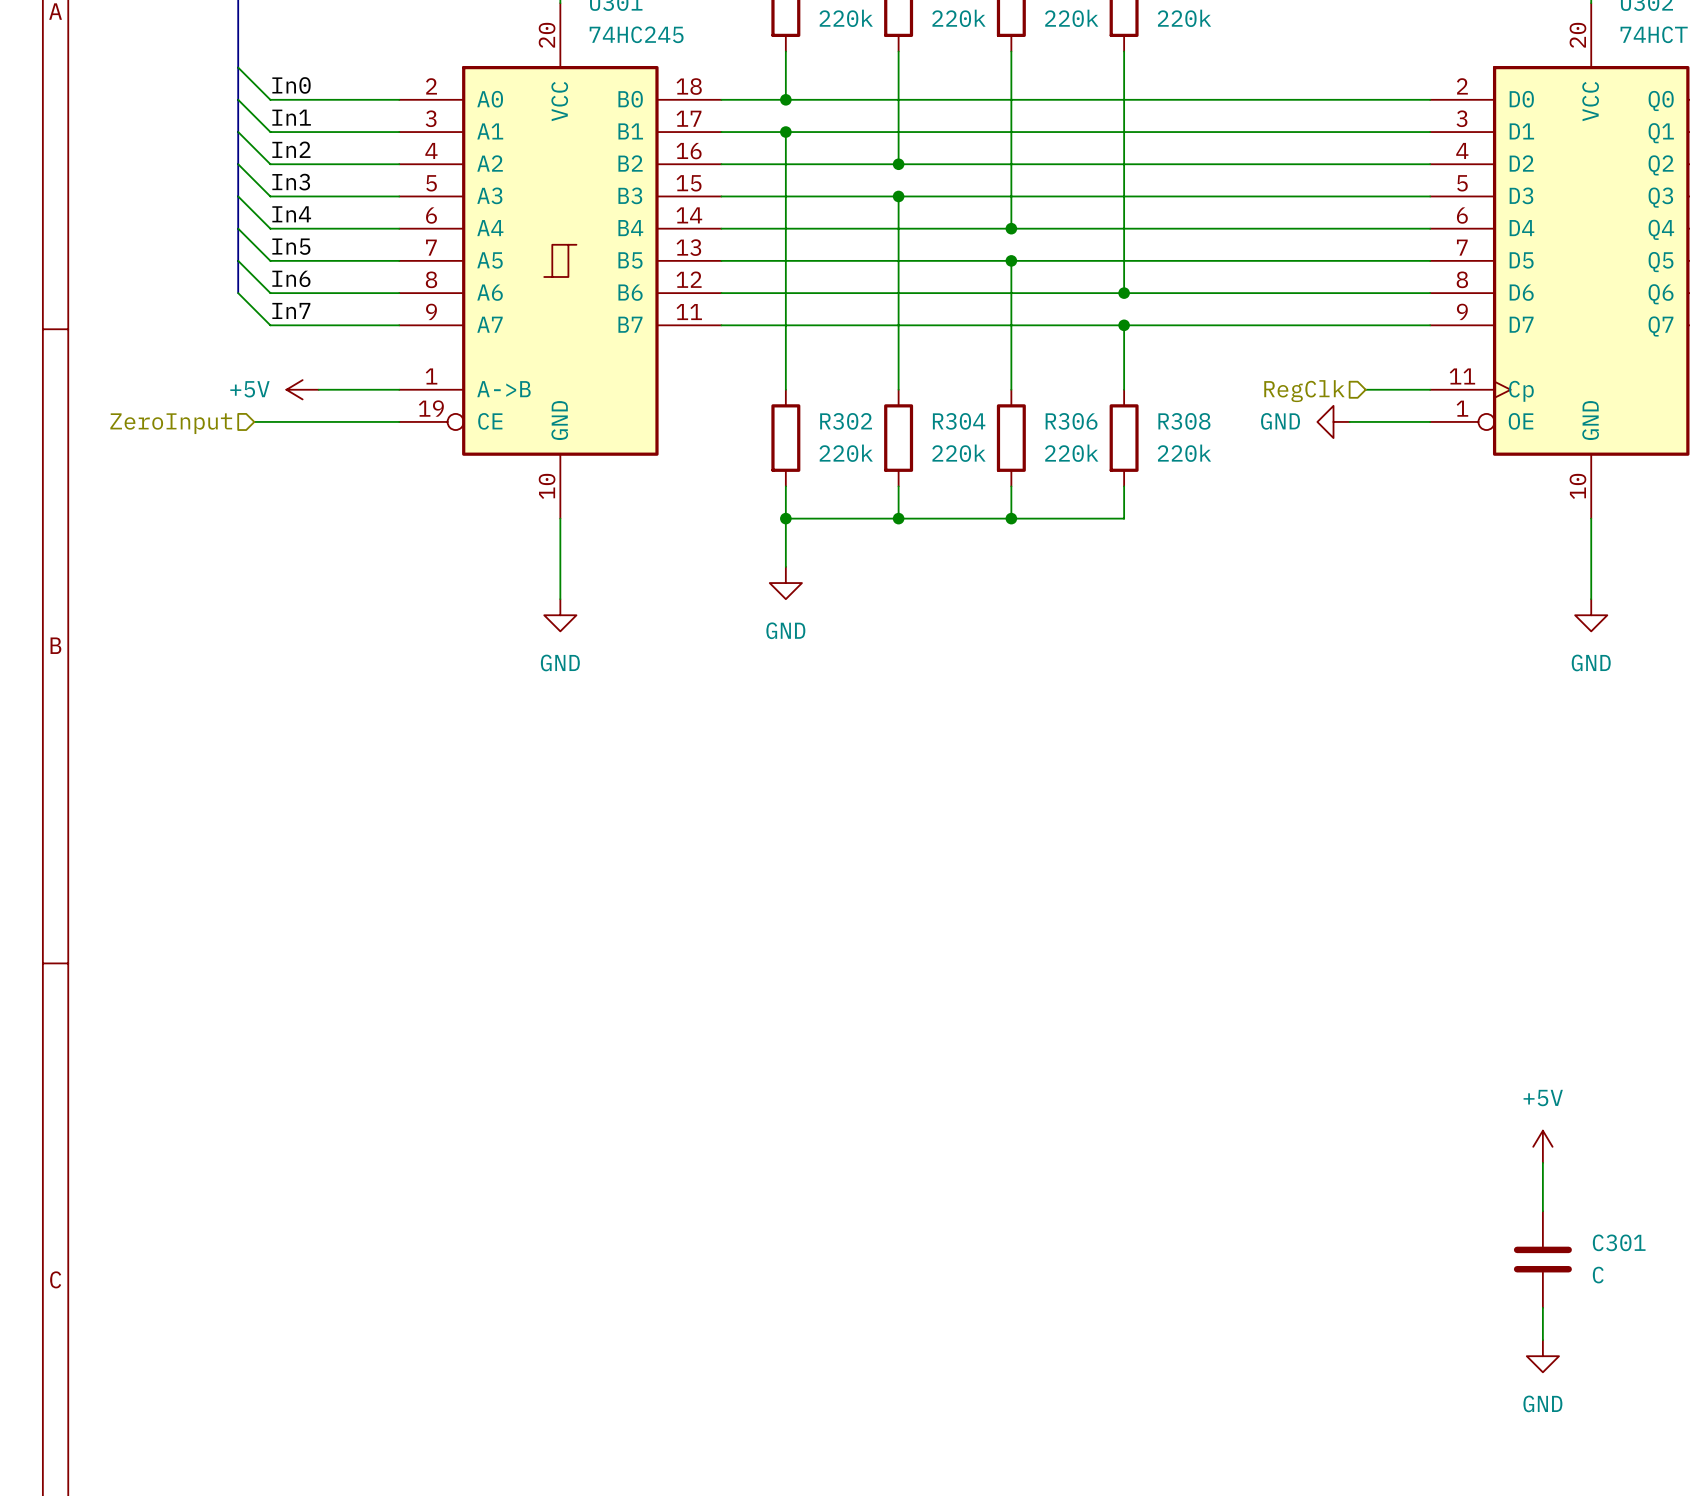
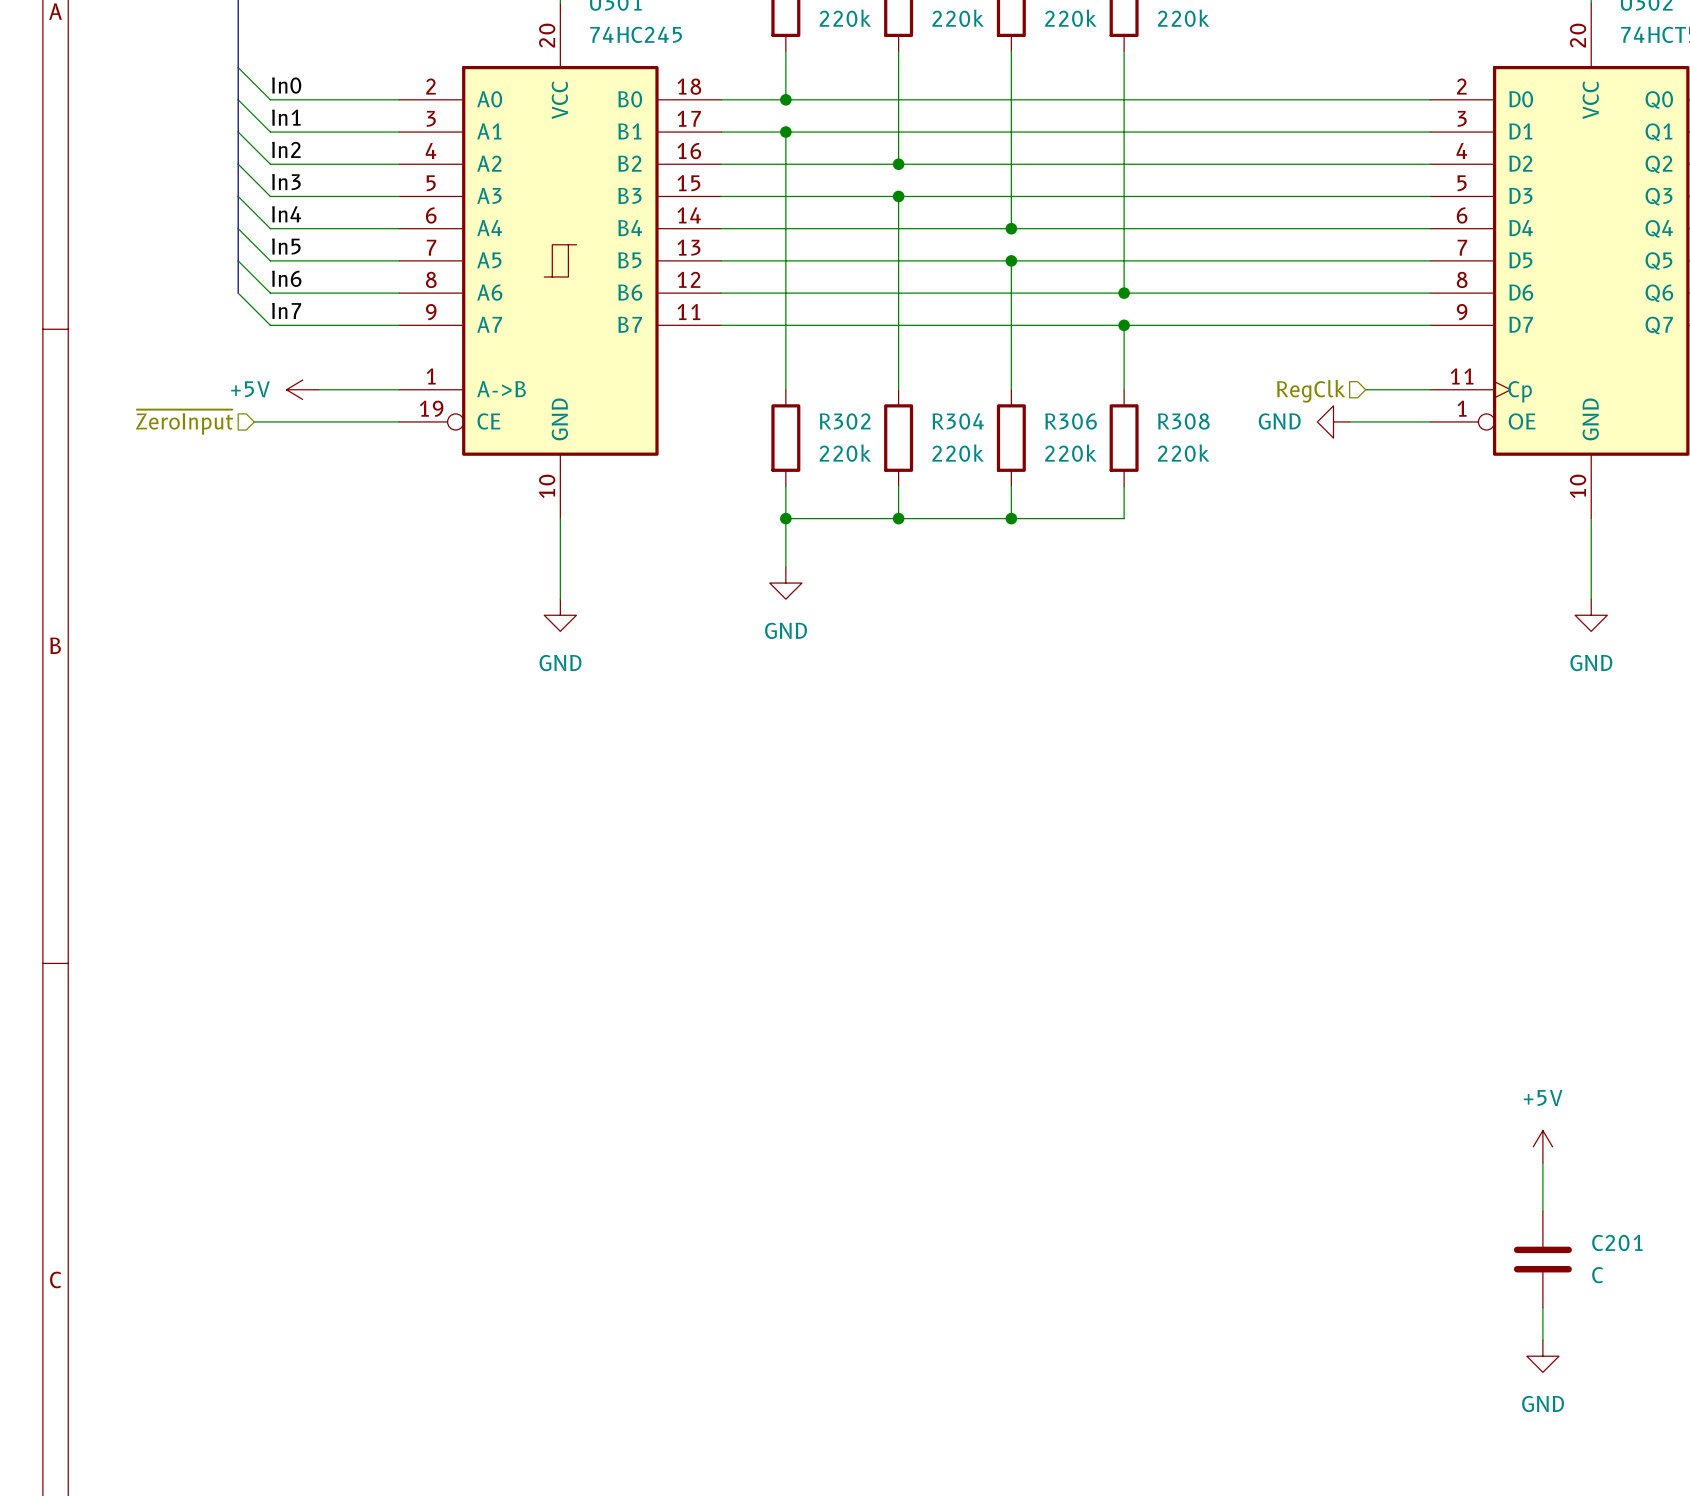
hierarchical label: ZeroInput (171, 423) -> ~{ZeroInput} (184, 422)
C301 name: C301 (1619, 1242) -> C201 (1617, 1242)

